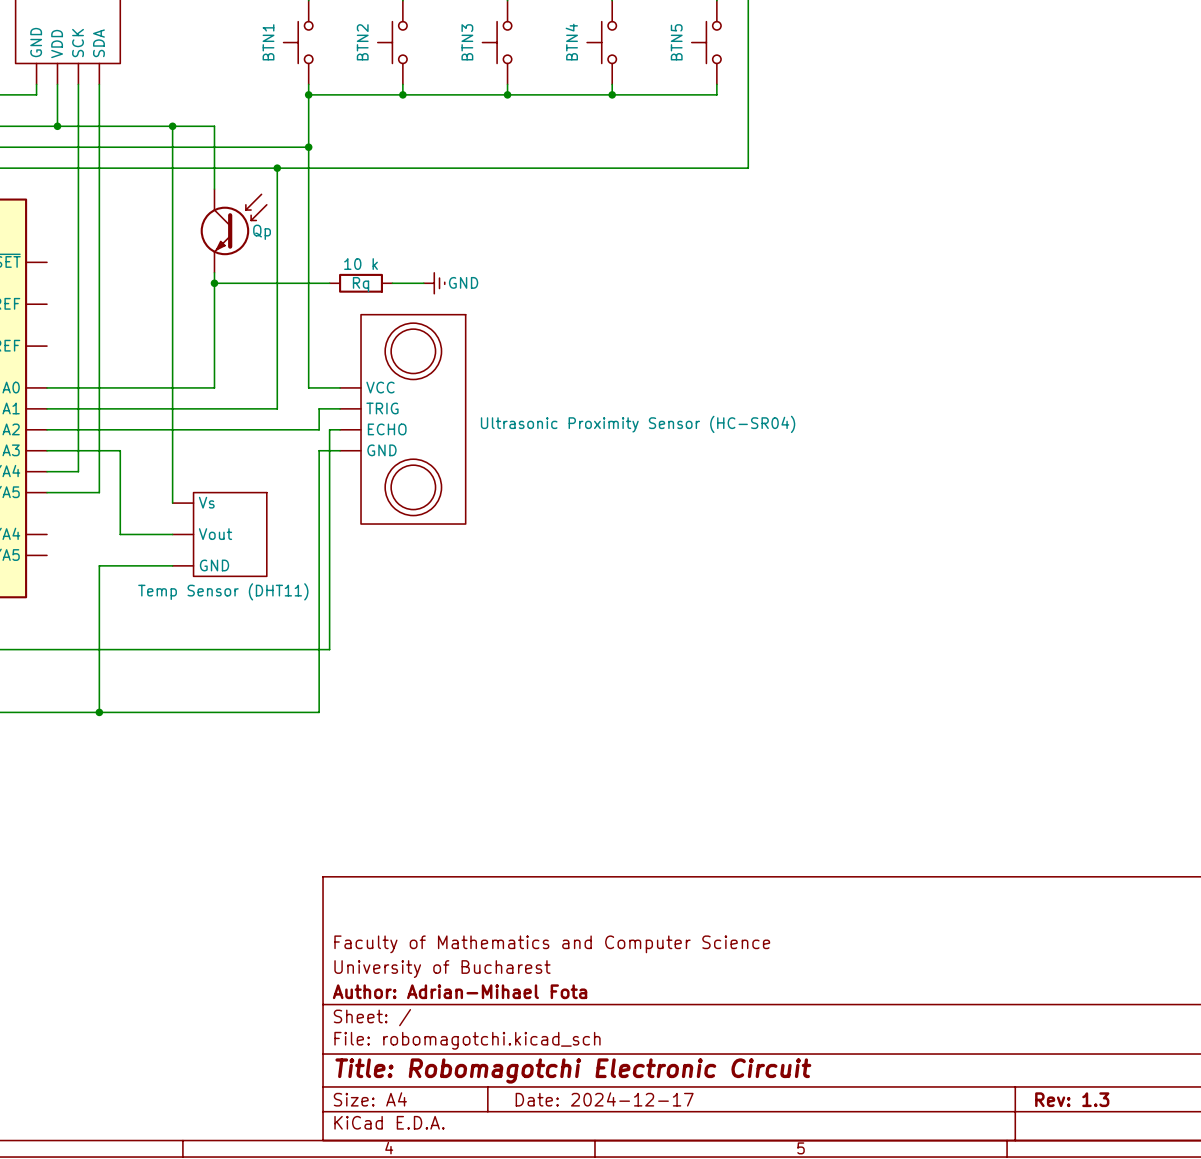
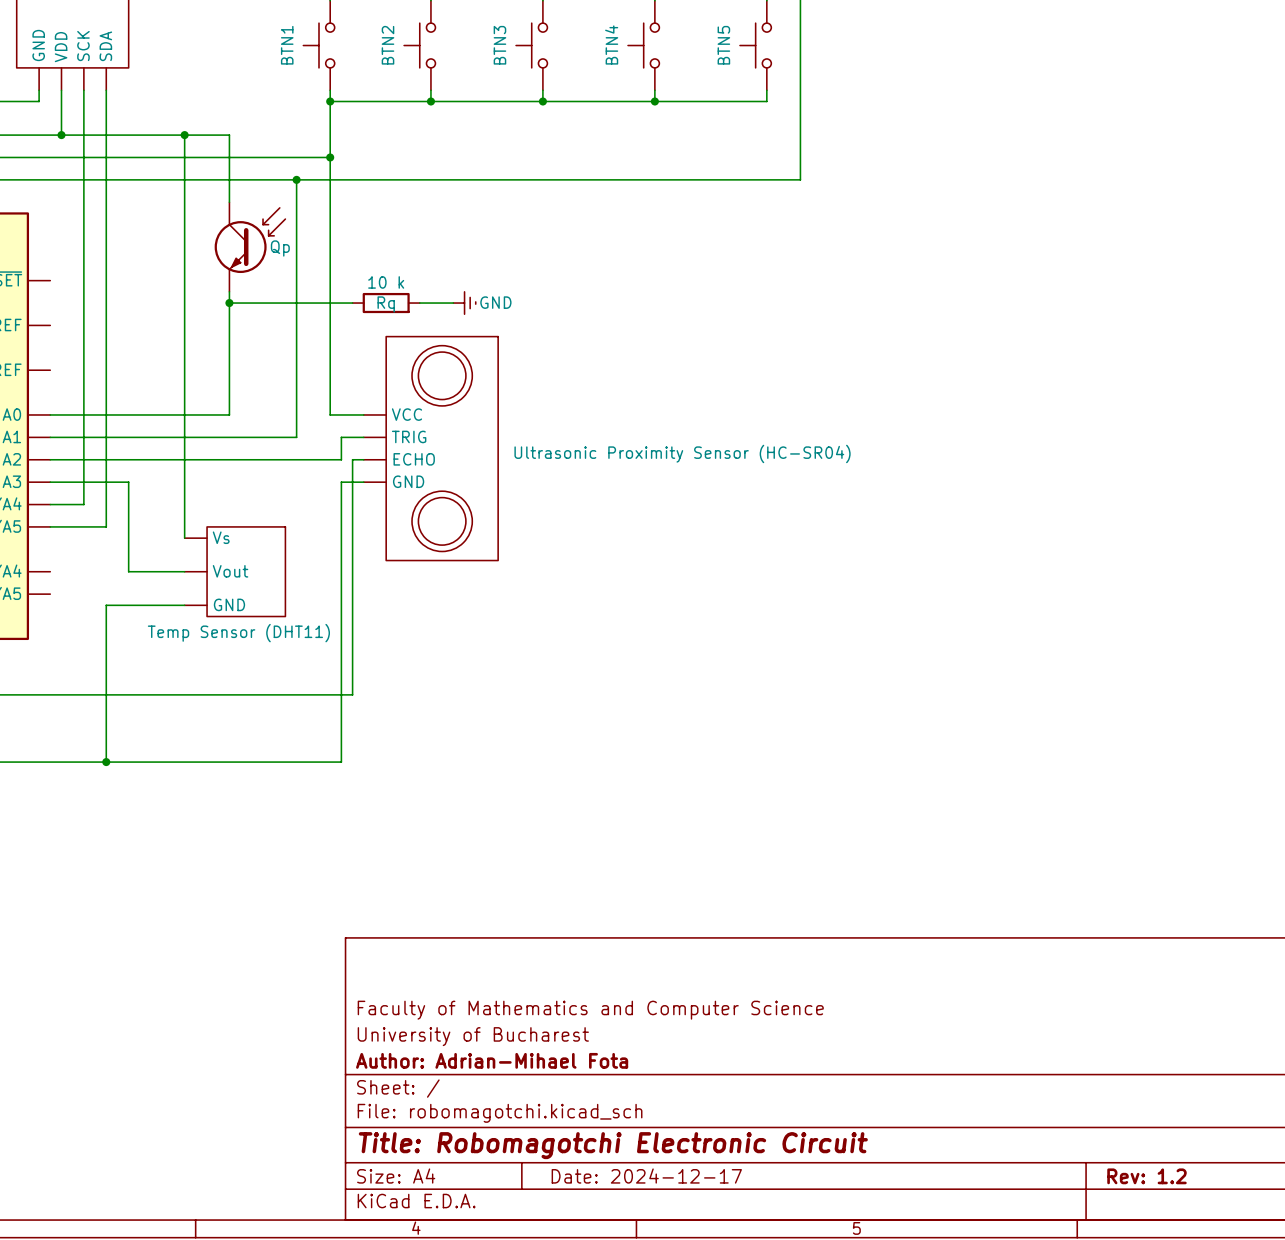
title block: Rev: 1.3 (1072, 1099) -> Rev: 1.2 (1146, 1176)

